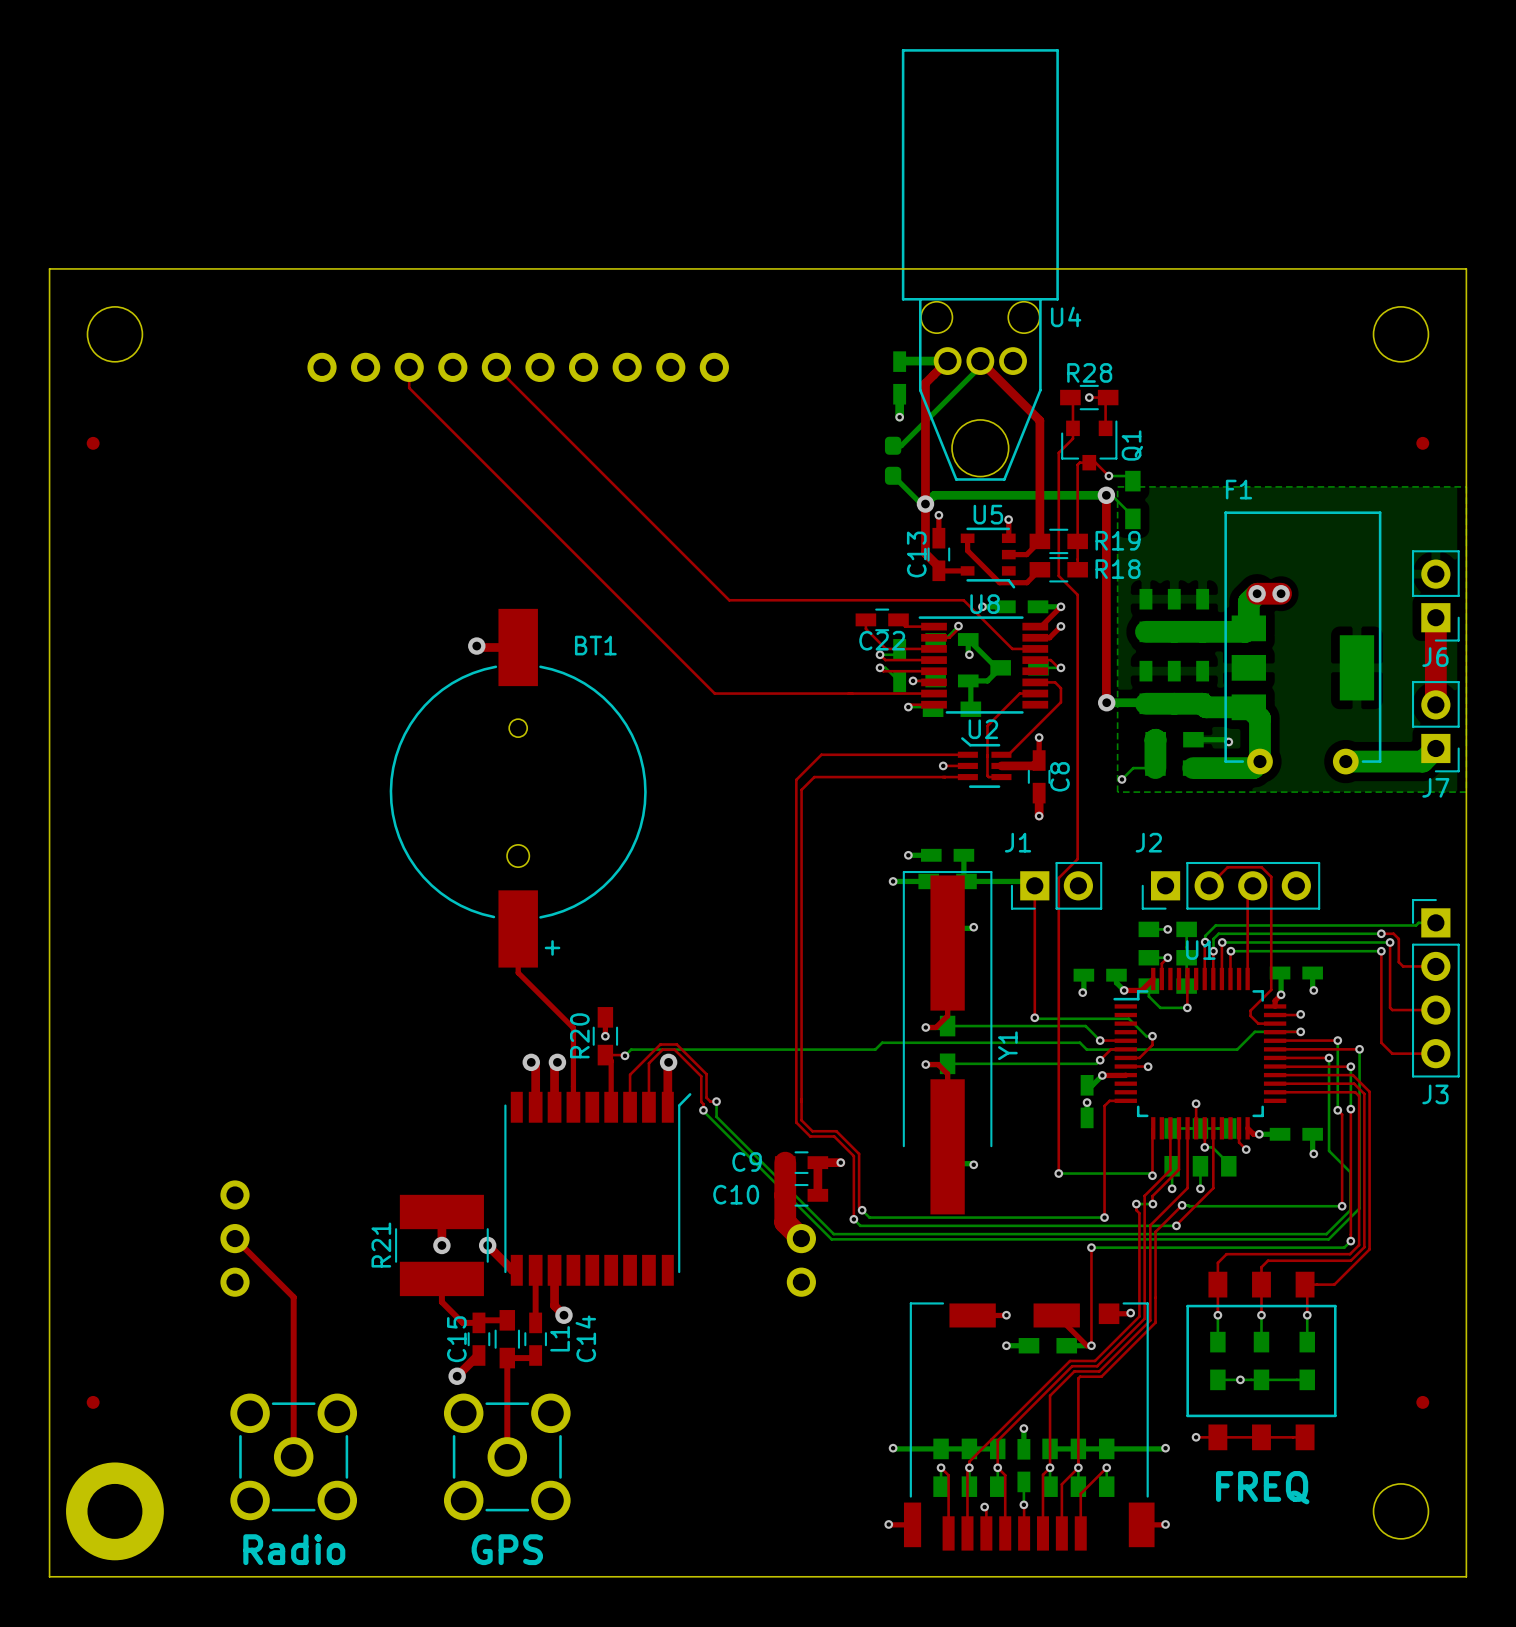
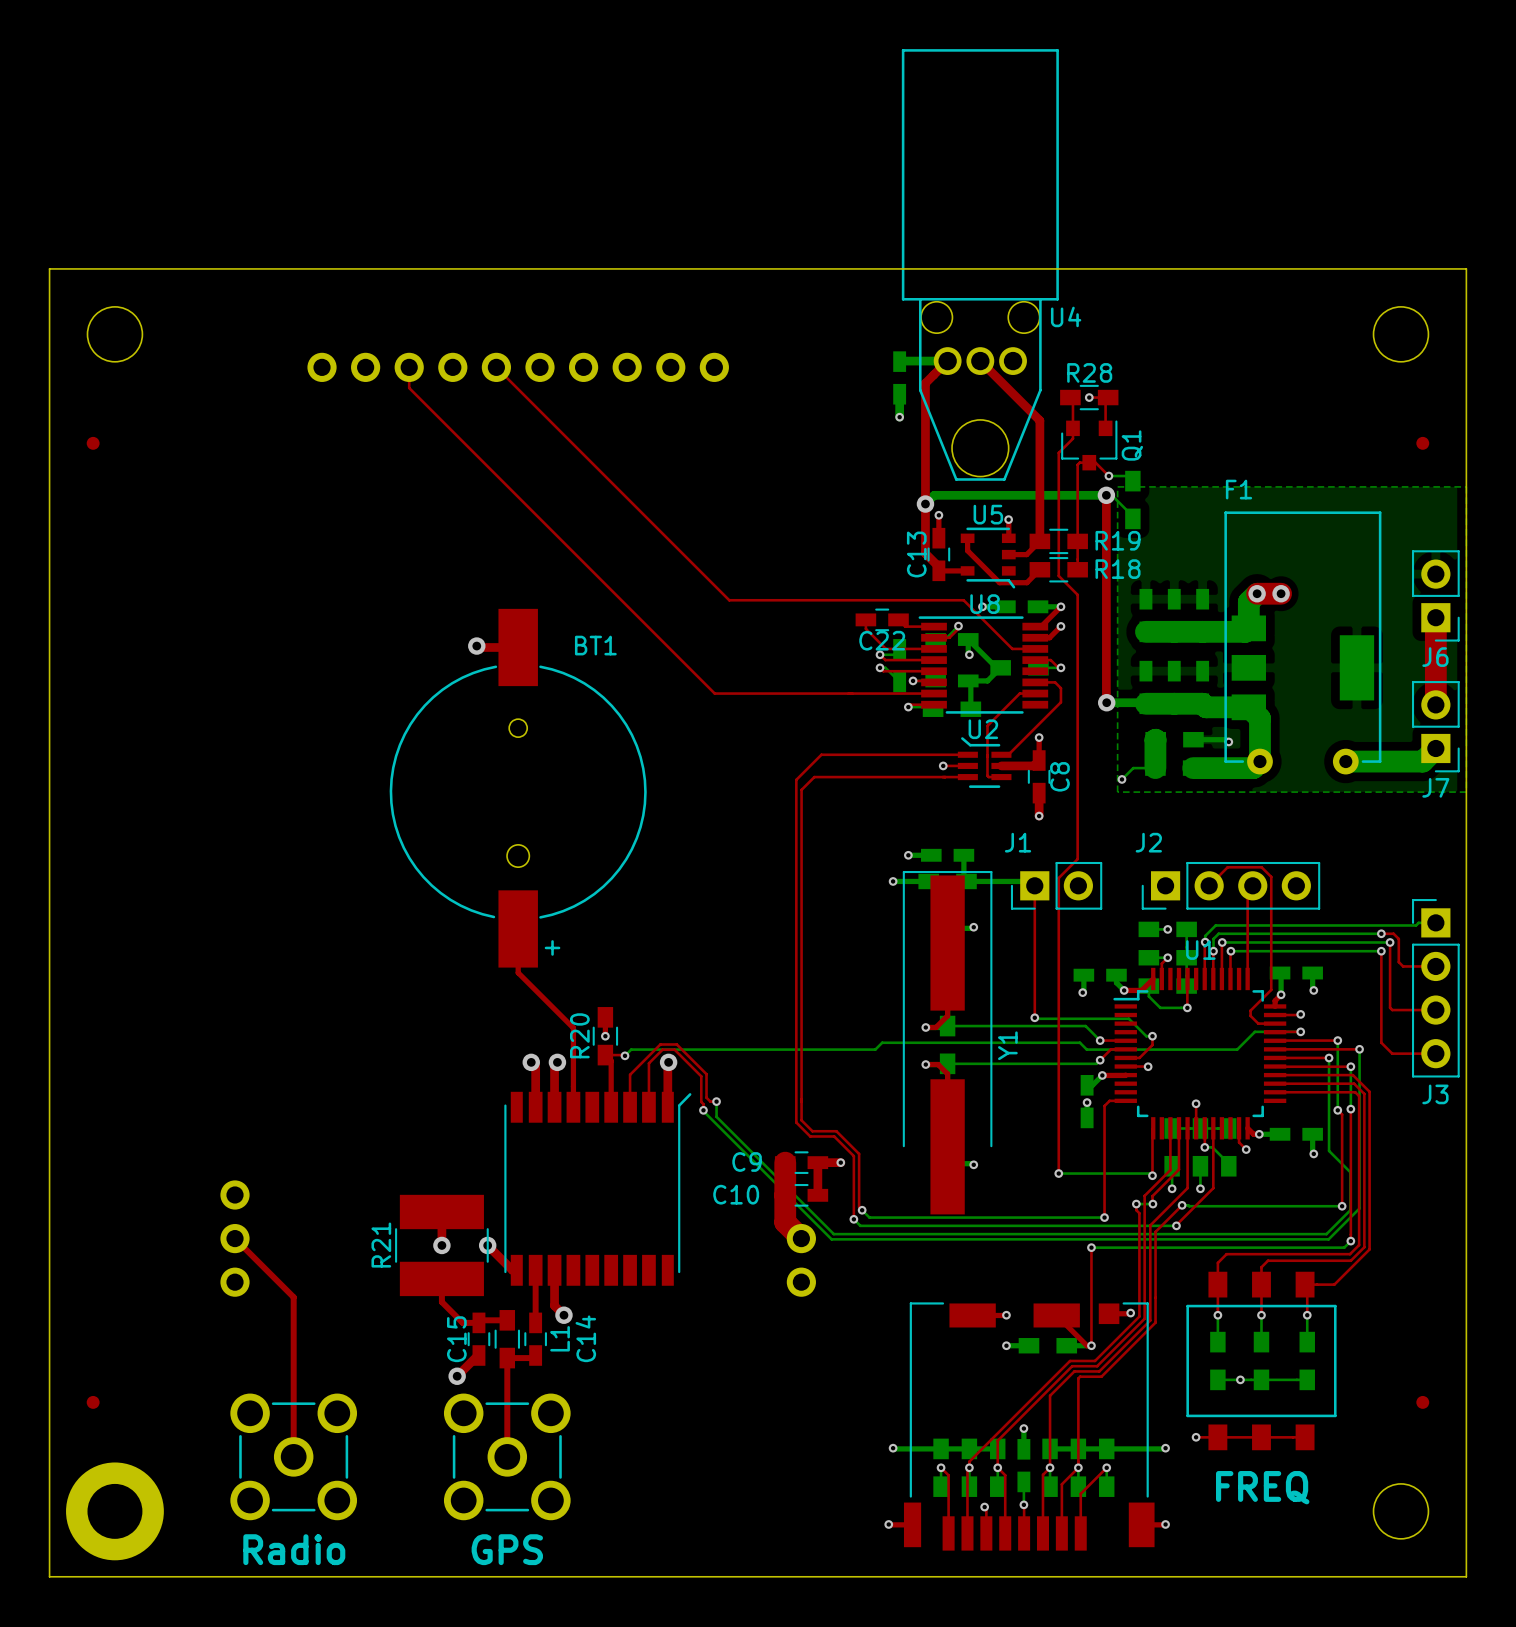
bottom track: (980, 361) (980, 366) (901, 445) (893, 445) -> none
part: (893, 460) -> none
bottom track: (893, 475) (921, 504) (925, 504) -> none

